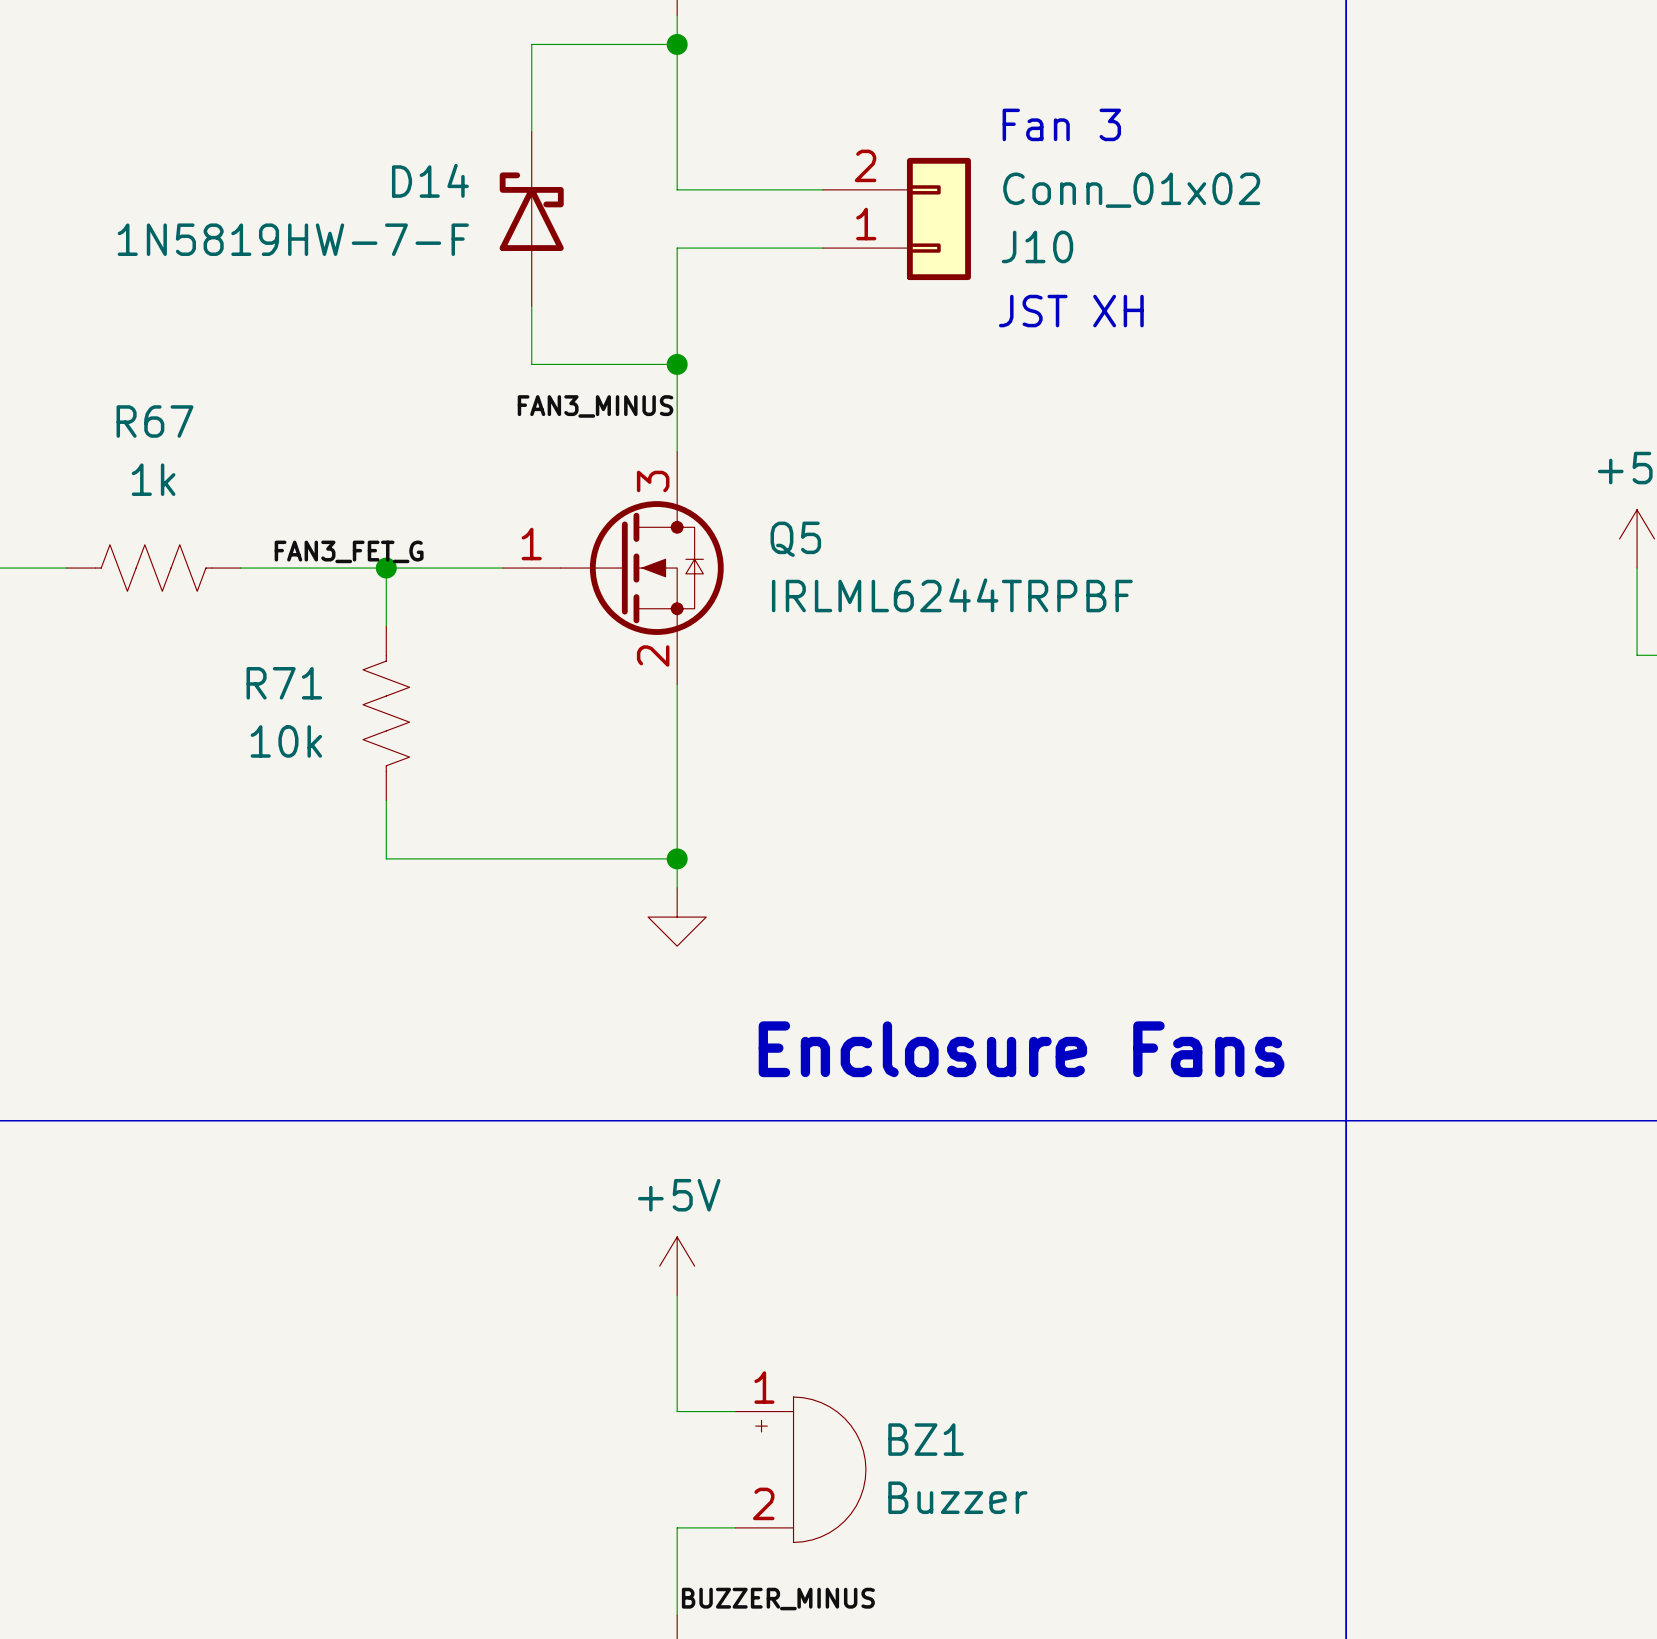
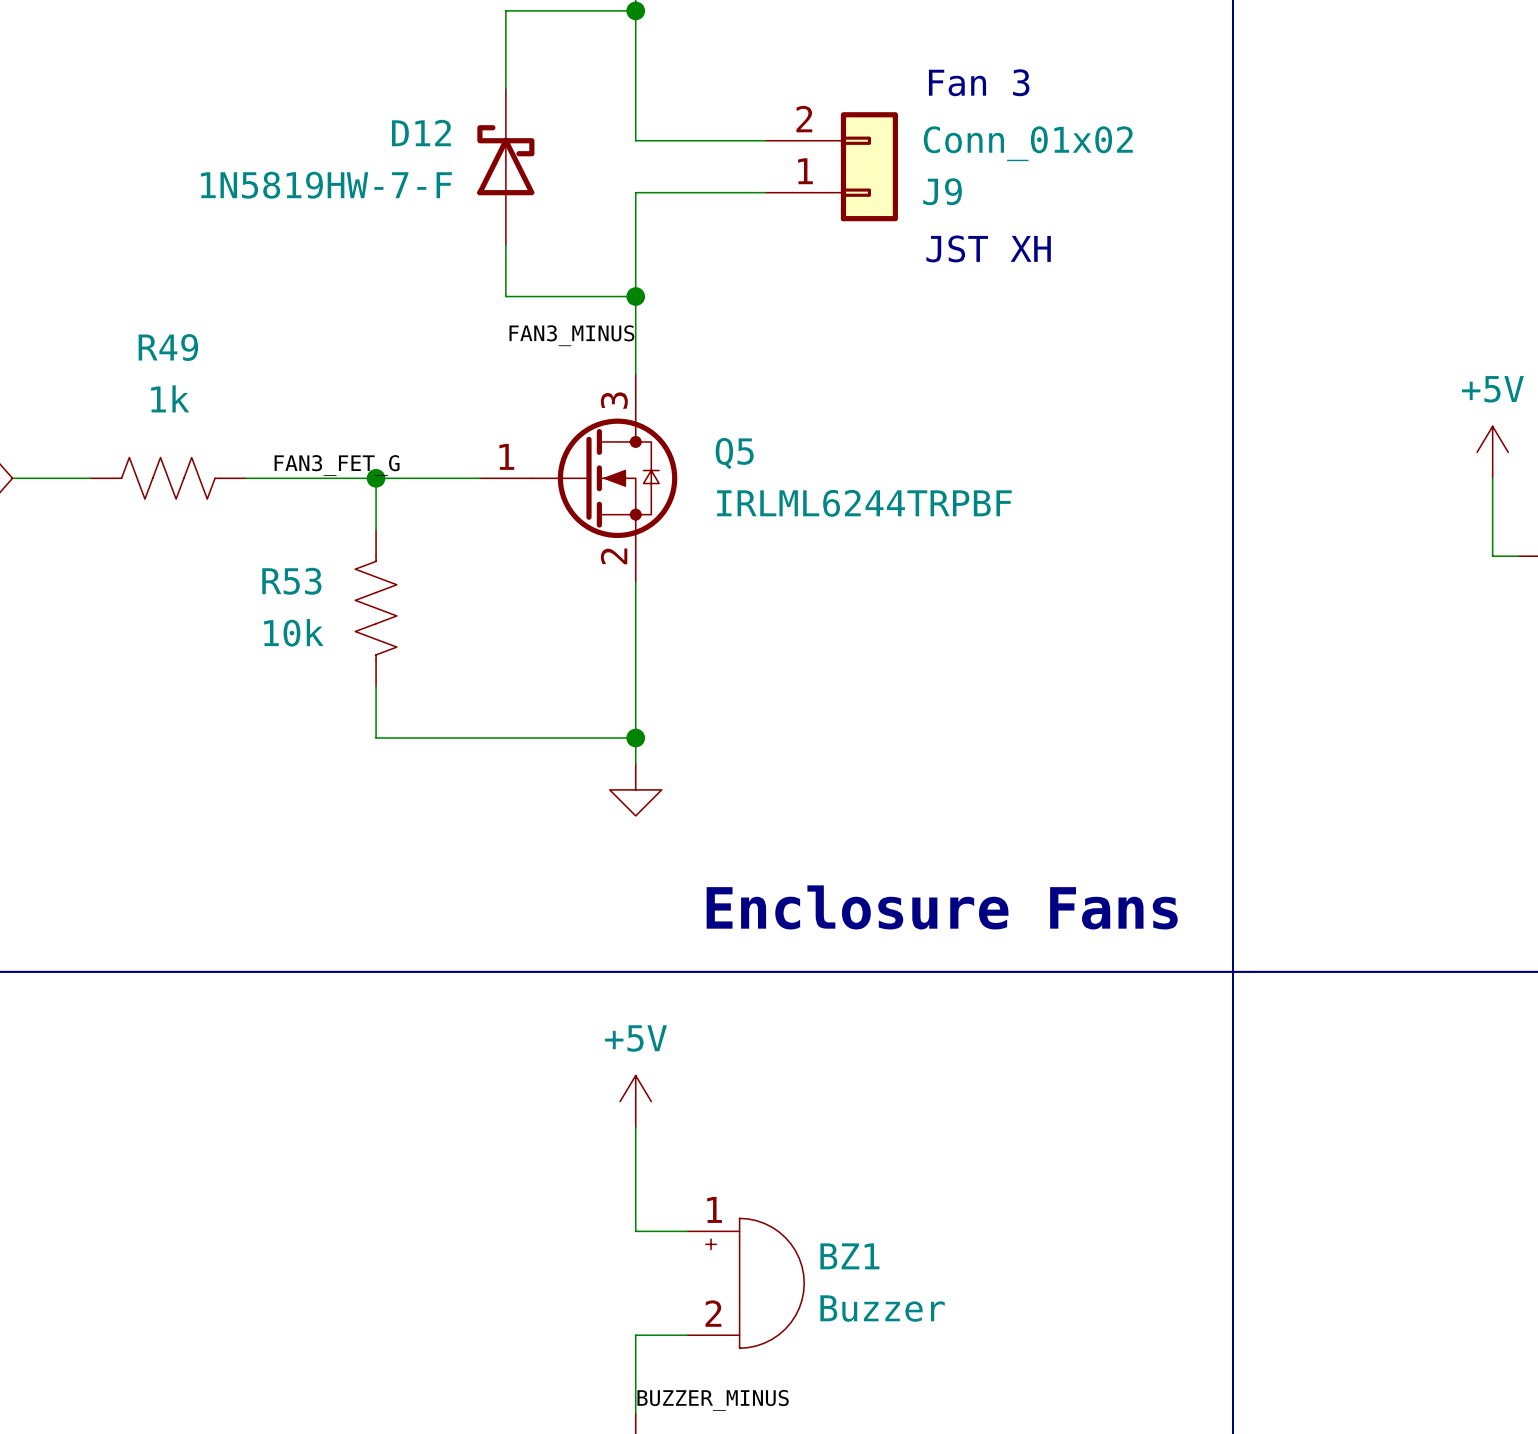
D14 name: D14 (430, 180) -> D12 (421, 133)
J10 name: J10 (1037, 246) -> J9 (942, 191)
R67 name: R67 (154, 421) -> R49 (168, 347)
R71 name: R71 (284, 683) -> R53 (291, 581)

